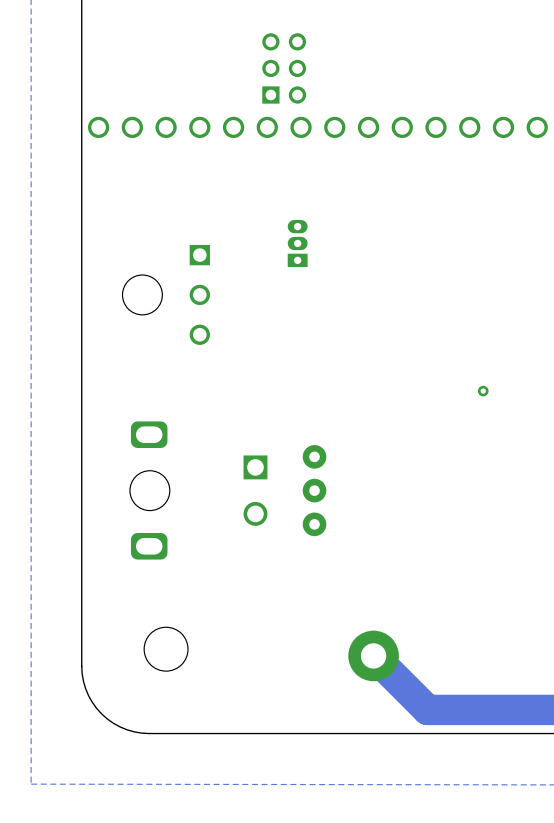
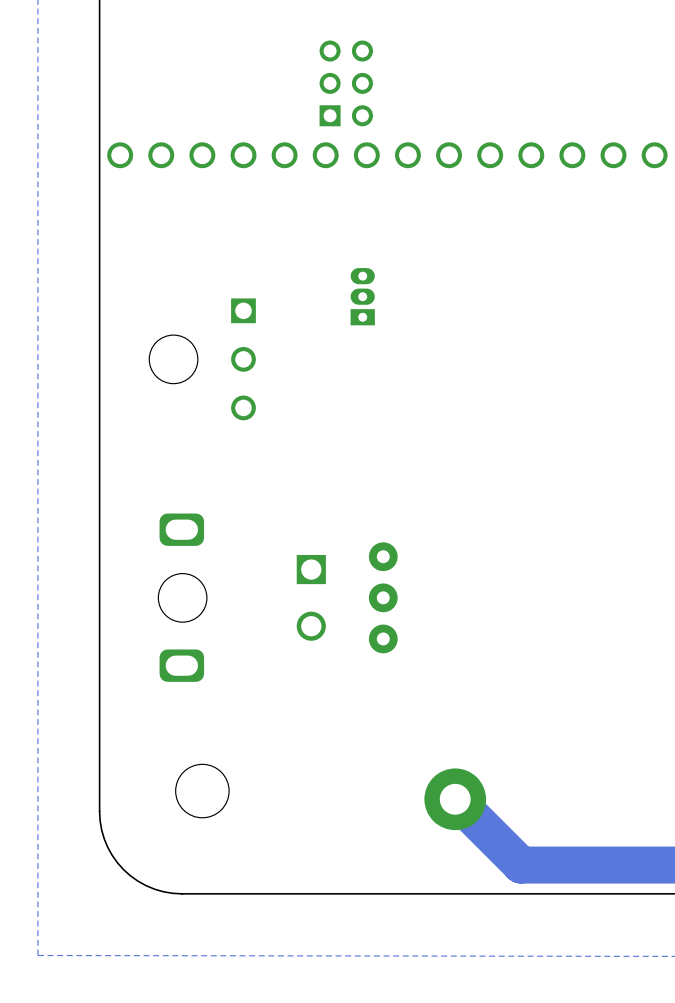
via: (483, 391) -> none

